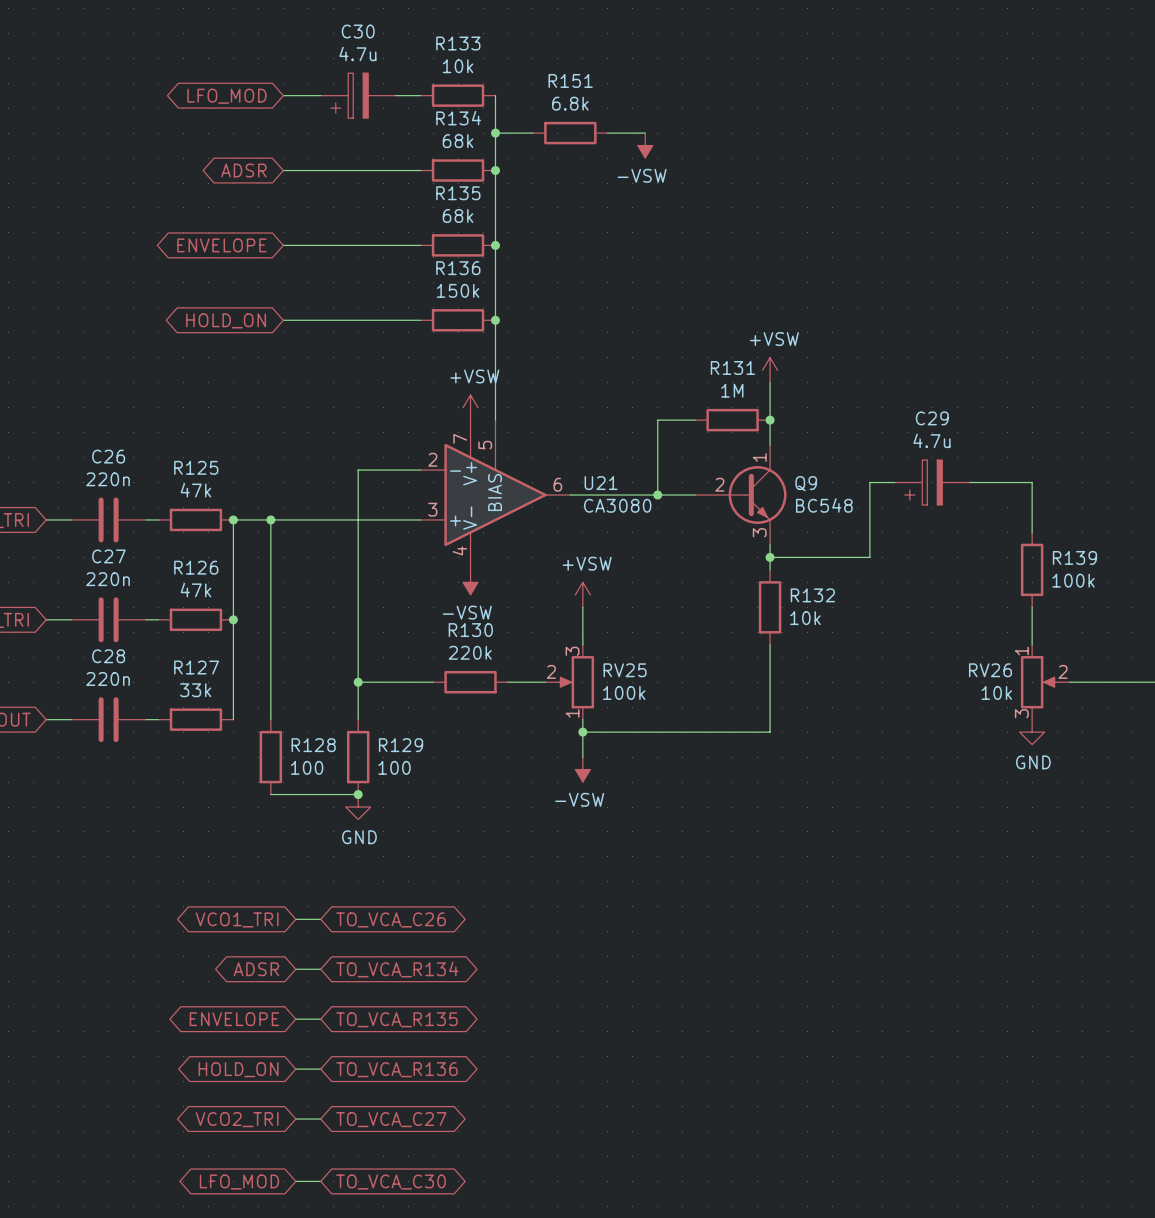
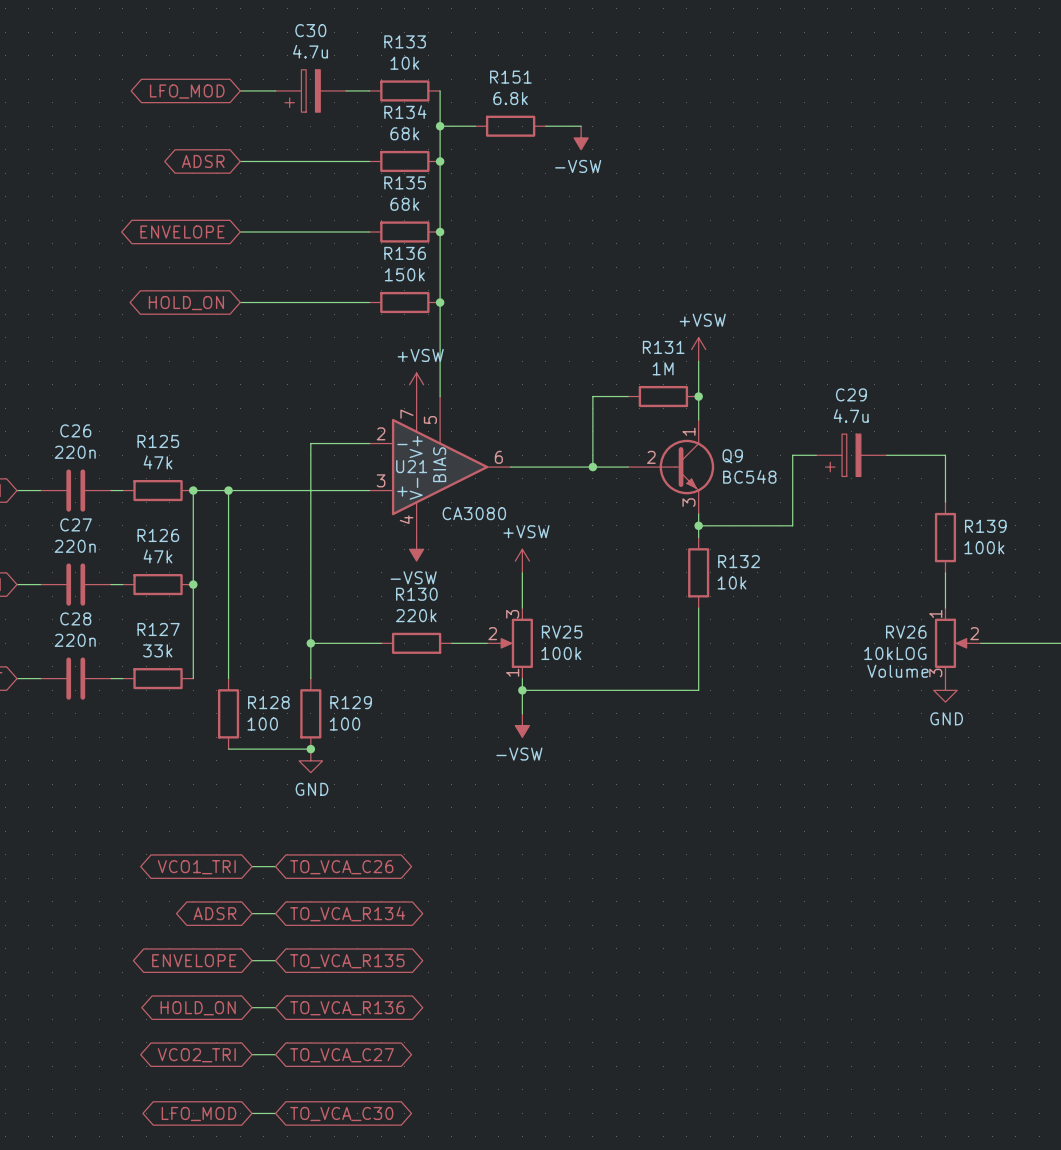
U21 name position: U21 (601, 483) -> U21 (411, 466)
U21 value position: CA3080 (617, 505) -> CA3080 (474, 513)
RV26 value: 10k (996, 692) -> 10kLOG (895, 653)
RV26 text: none -> Volume (897, 671)

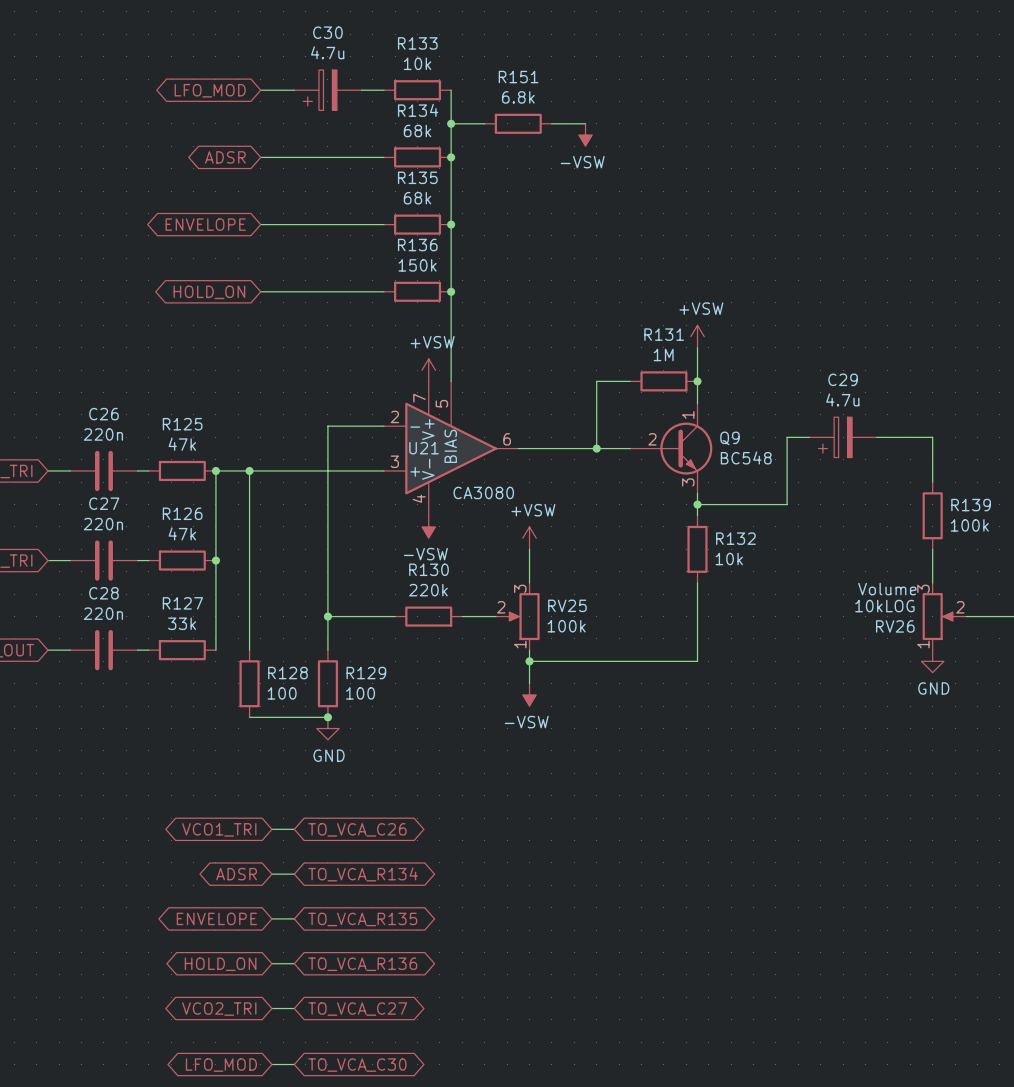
RV26 flip: as is (951, 643) -> up-down (938, 616)

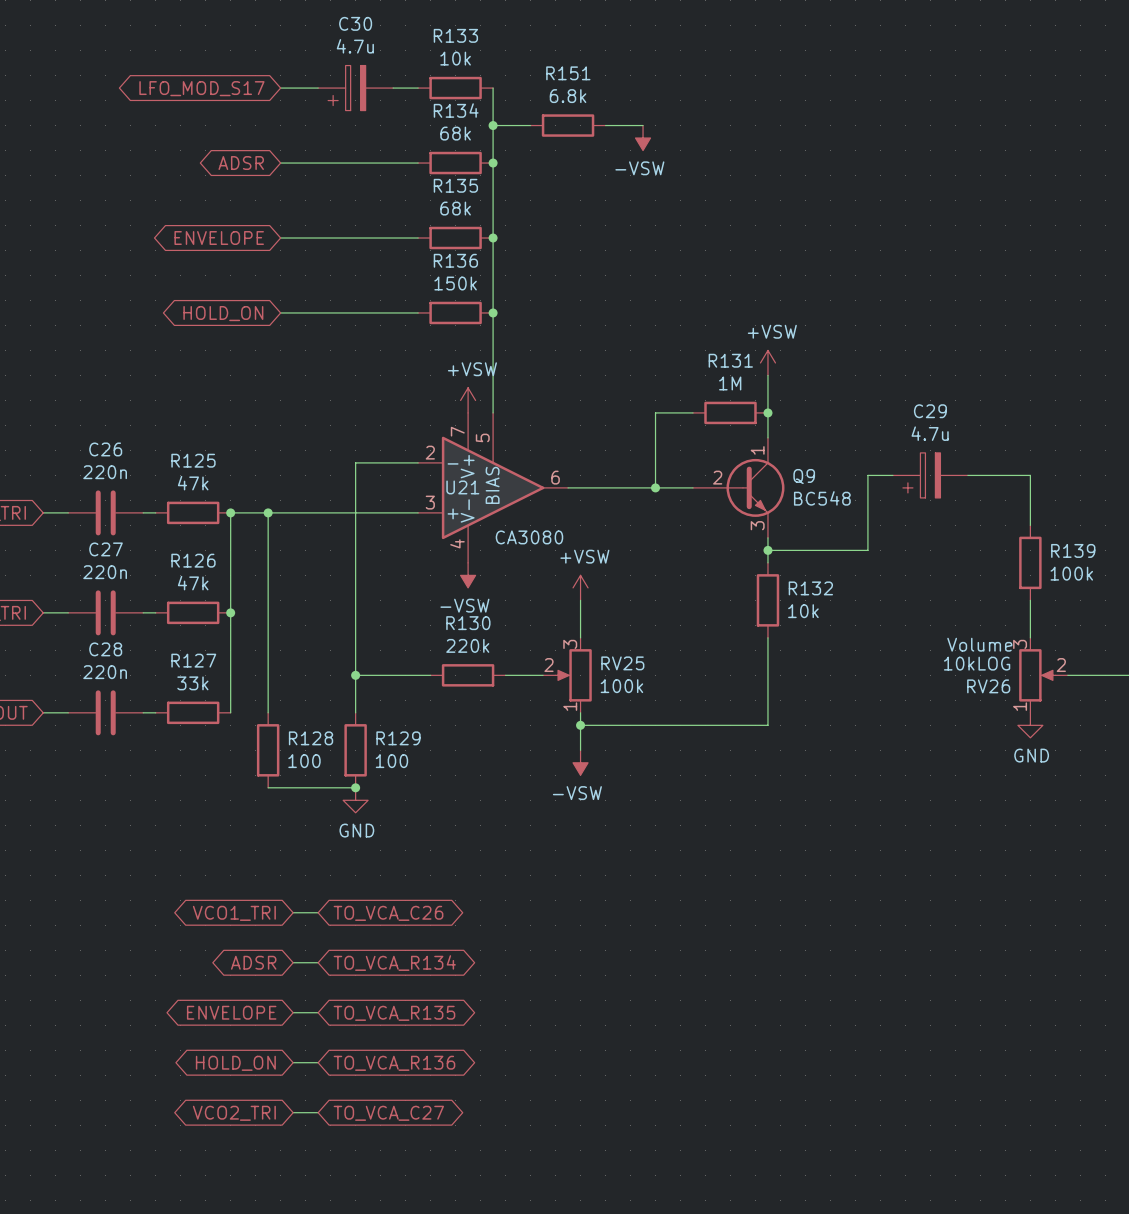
global label: LFO_MOD (210, 90) -> LFO_MOD_S17 (201, 88)
wire: (271, 1064) (294, 1064) -> none
global label: LFO_MOD (221, 1065) -> none
global label: TO_VCA_C30 (357, 1065) -> none

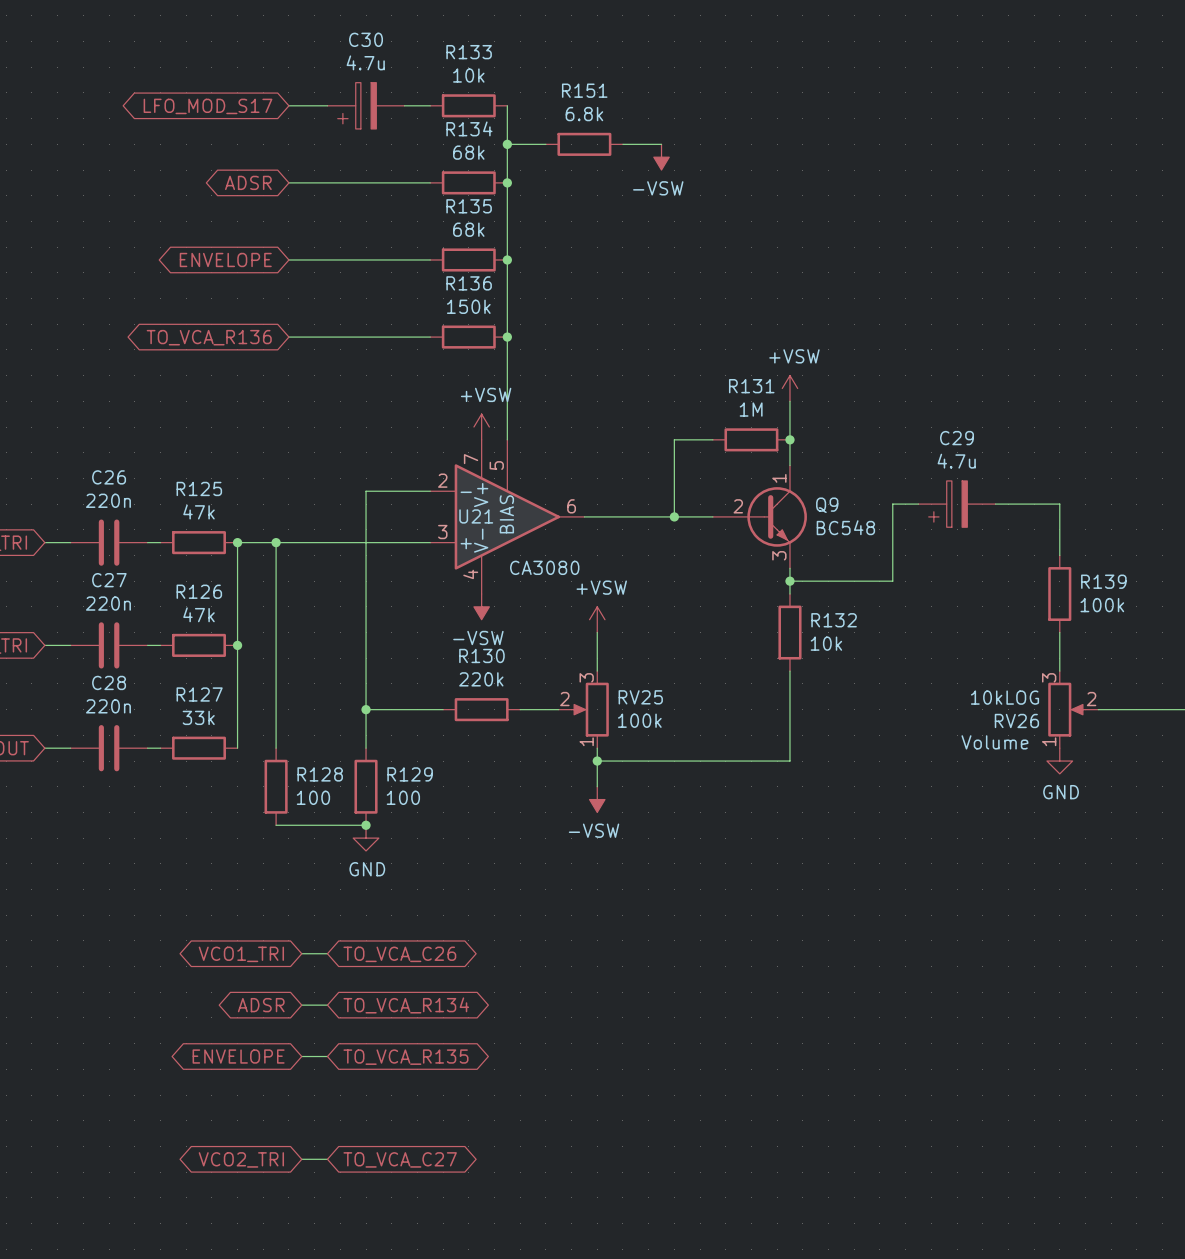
global label: HOLD_ON (223, 313) -> TO_VCA_R136 (209, 337)
RV26 text position: Volume (979, 644) -> Volume (994, 742)
wire: (293, 1062) (318, 1062) -> none
global label: HOLD_ON (235, 1063) -> none
global label: TO_VCA_R136 (394, 1063) -> none

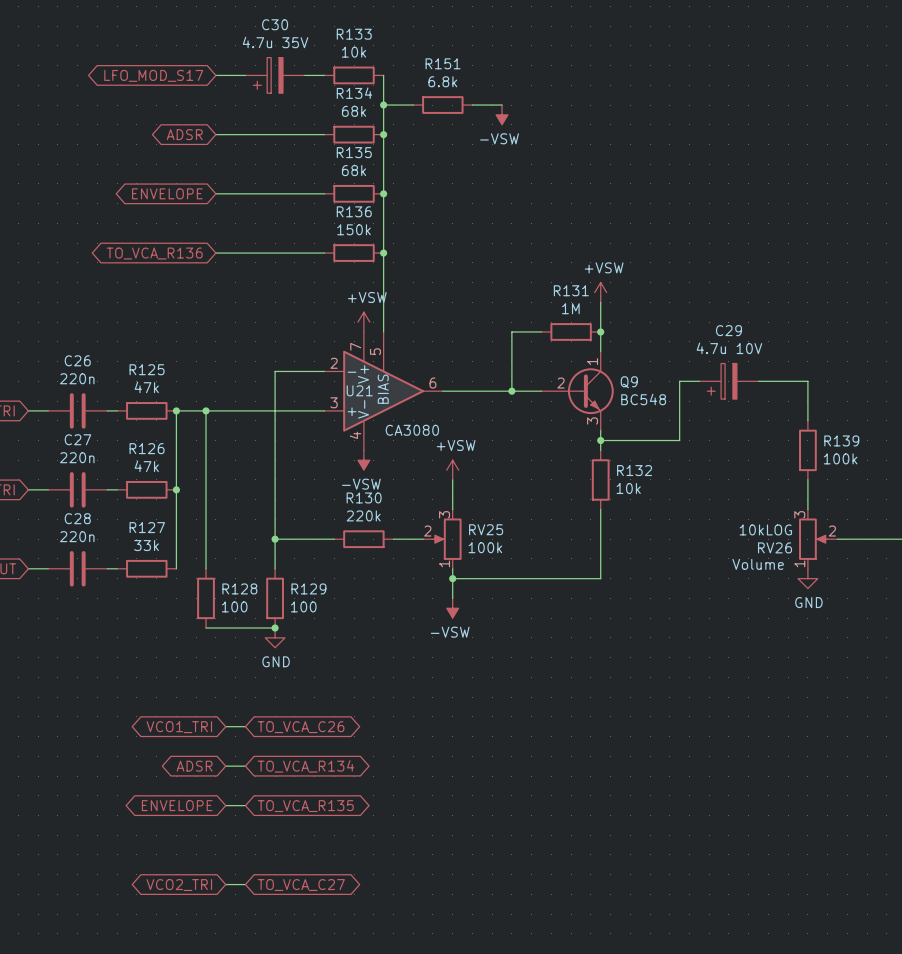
C30 value: 4.7u (365, 62) -> 4.7u 35V (275, 42)
C29 value: 4.7u (956, 461) -> 4.7u 10V (729, 348)

